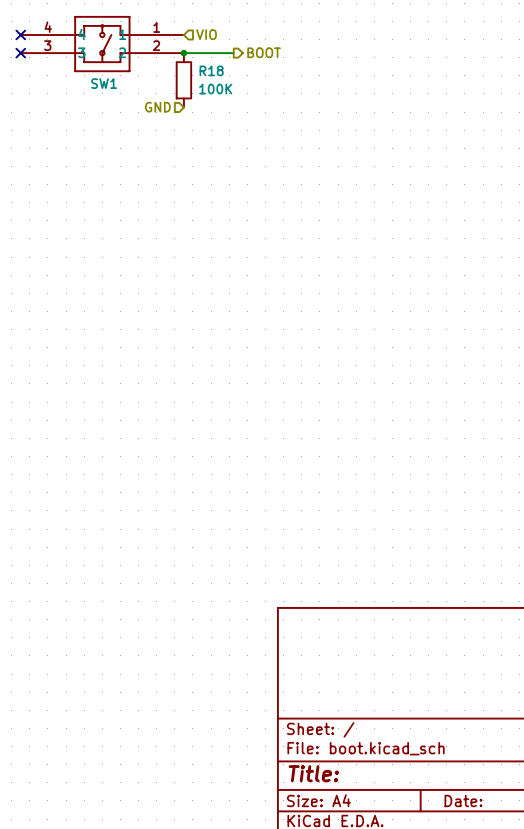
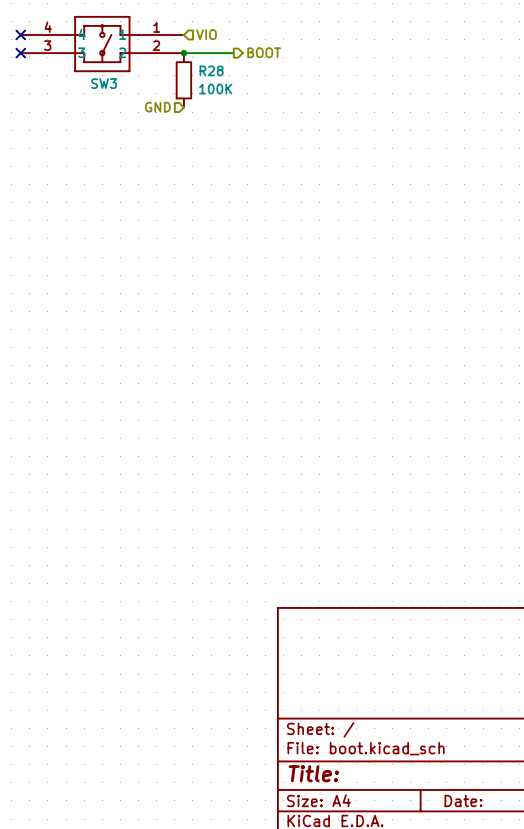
R18 name: R18 (211, 70) -> R28 (211, 70)
SW1 name: SW1 (104, 83) -> SW3 (104, 83)

